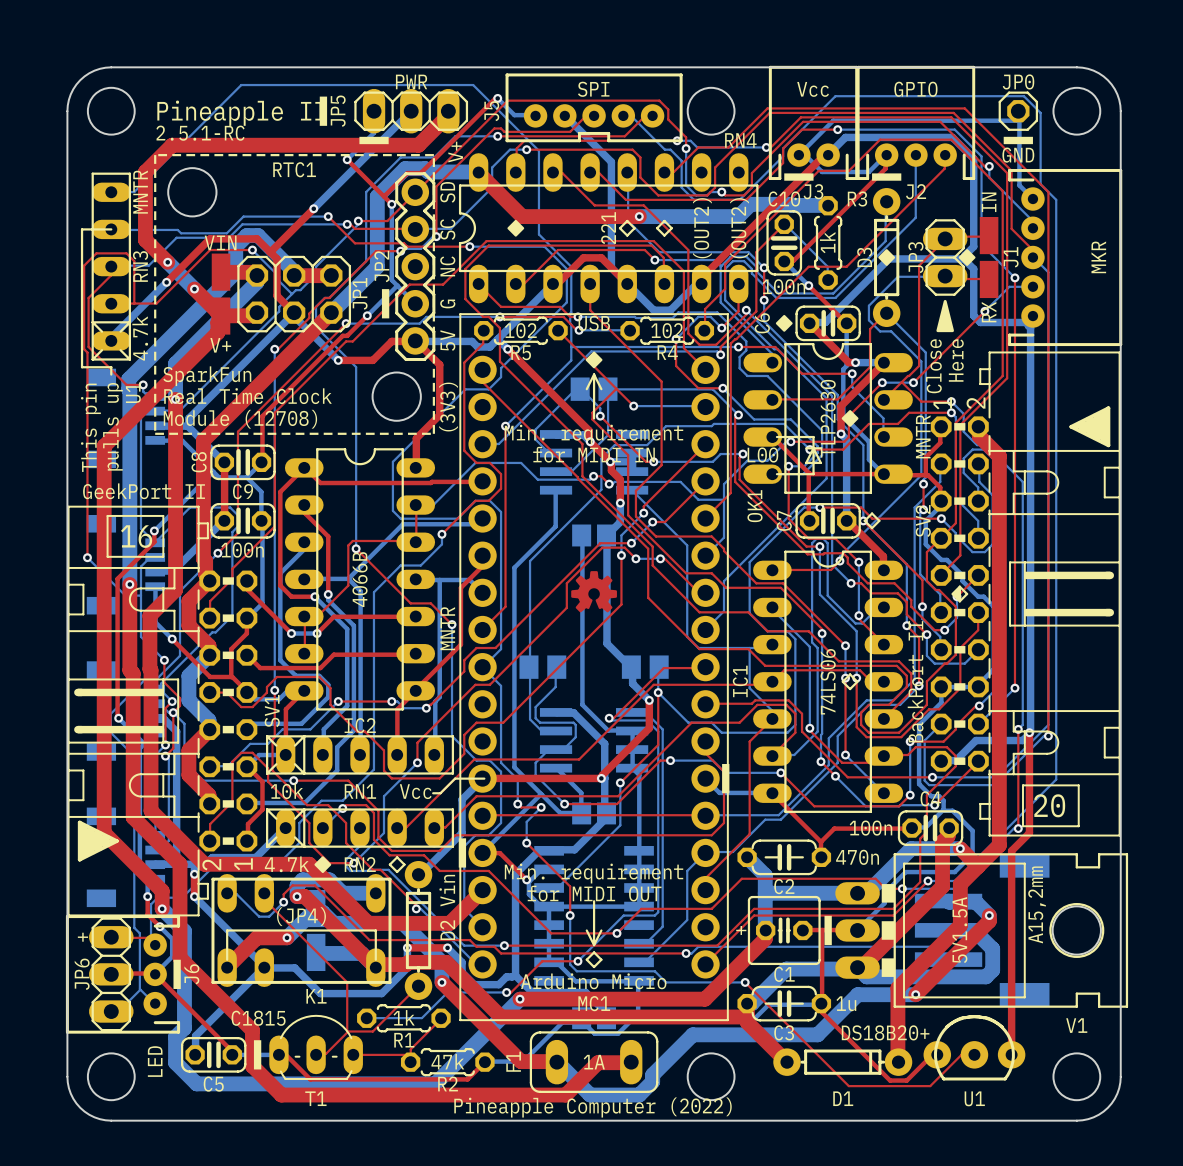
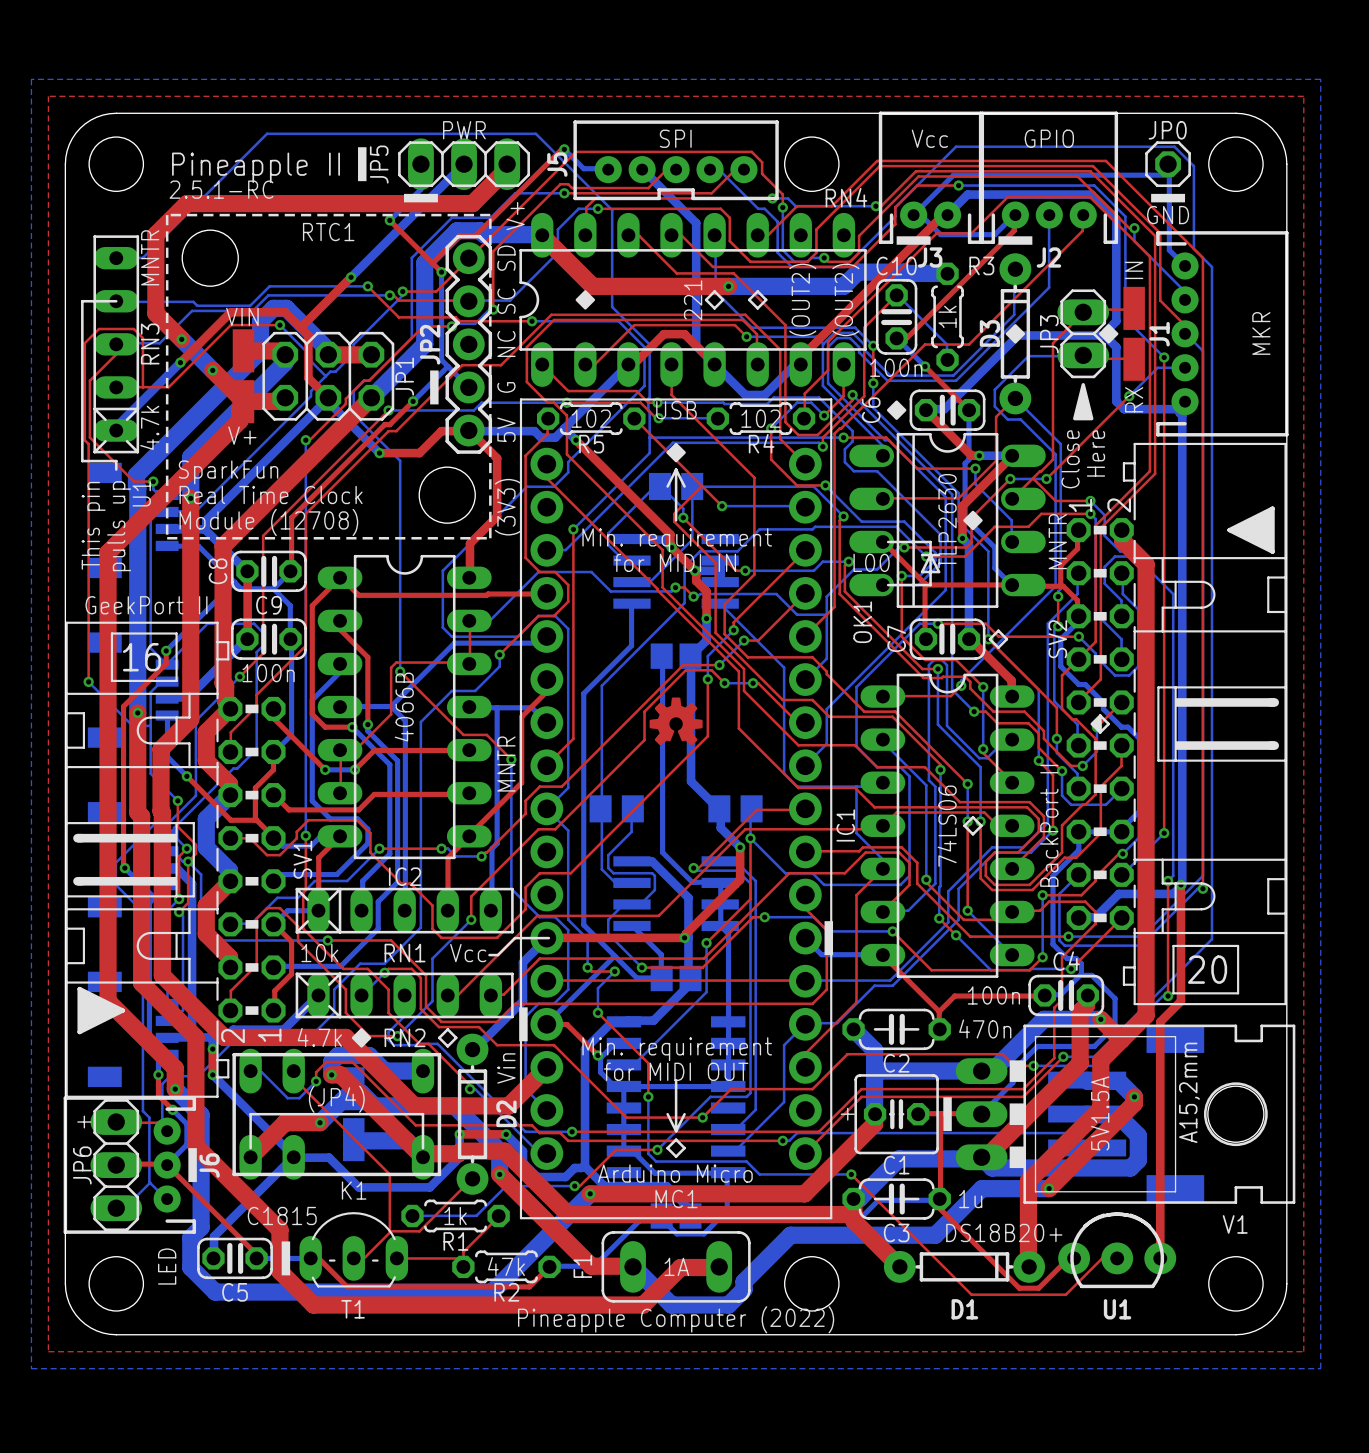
bottom zone outline: none -> (31, 79) (1320, 79) (1320, 1368) (31, 1368) (31, 79)
top zone outline: none -> (48, 96) (1303, 96) (1303, 1351) (48, 1351) (48, 96)

